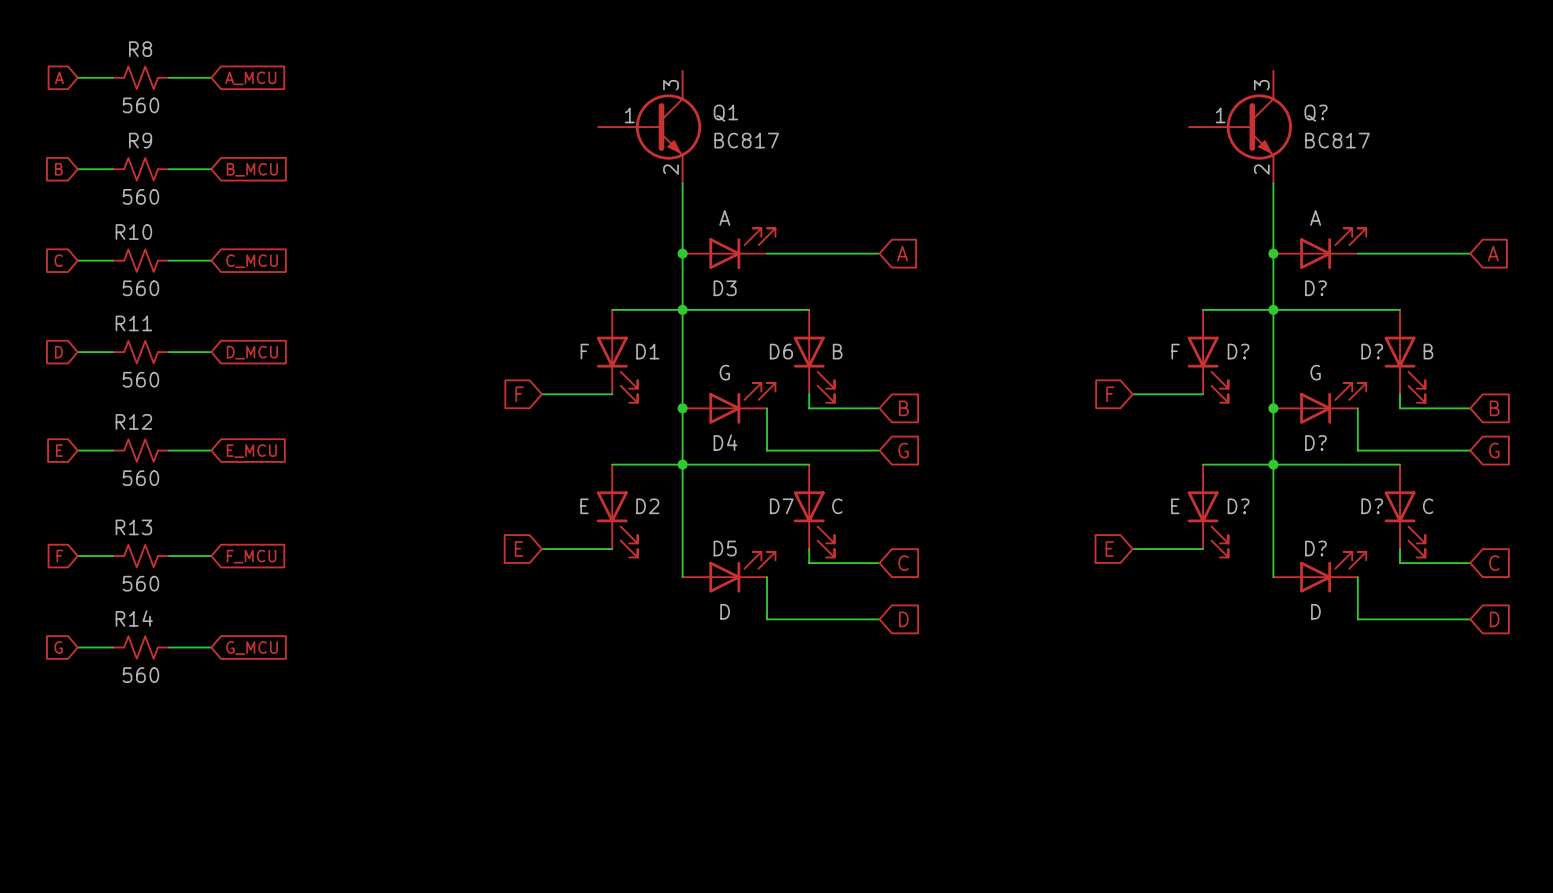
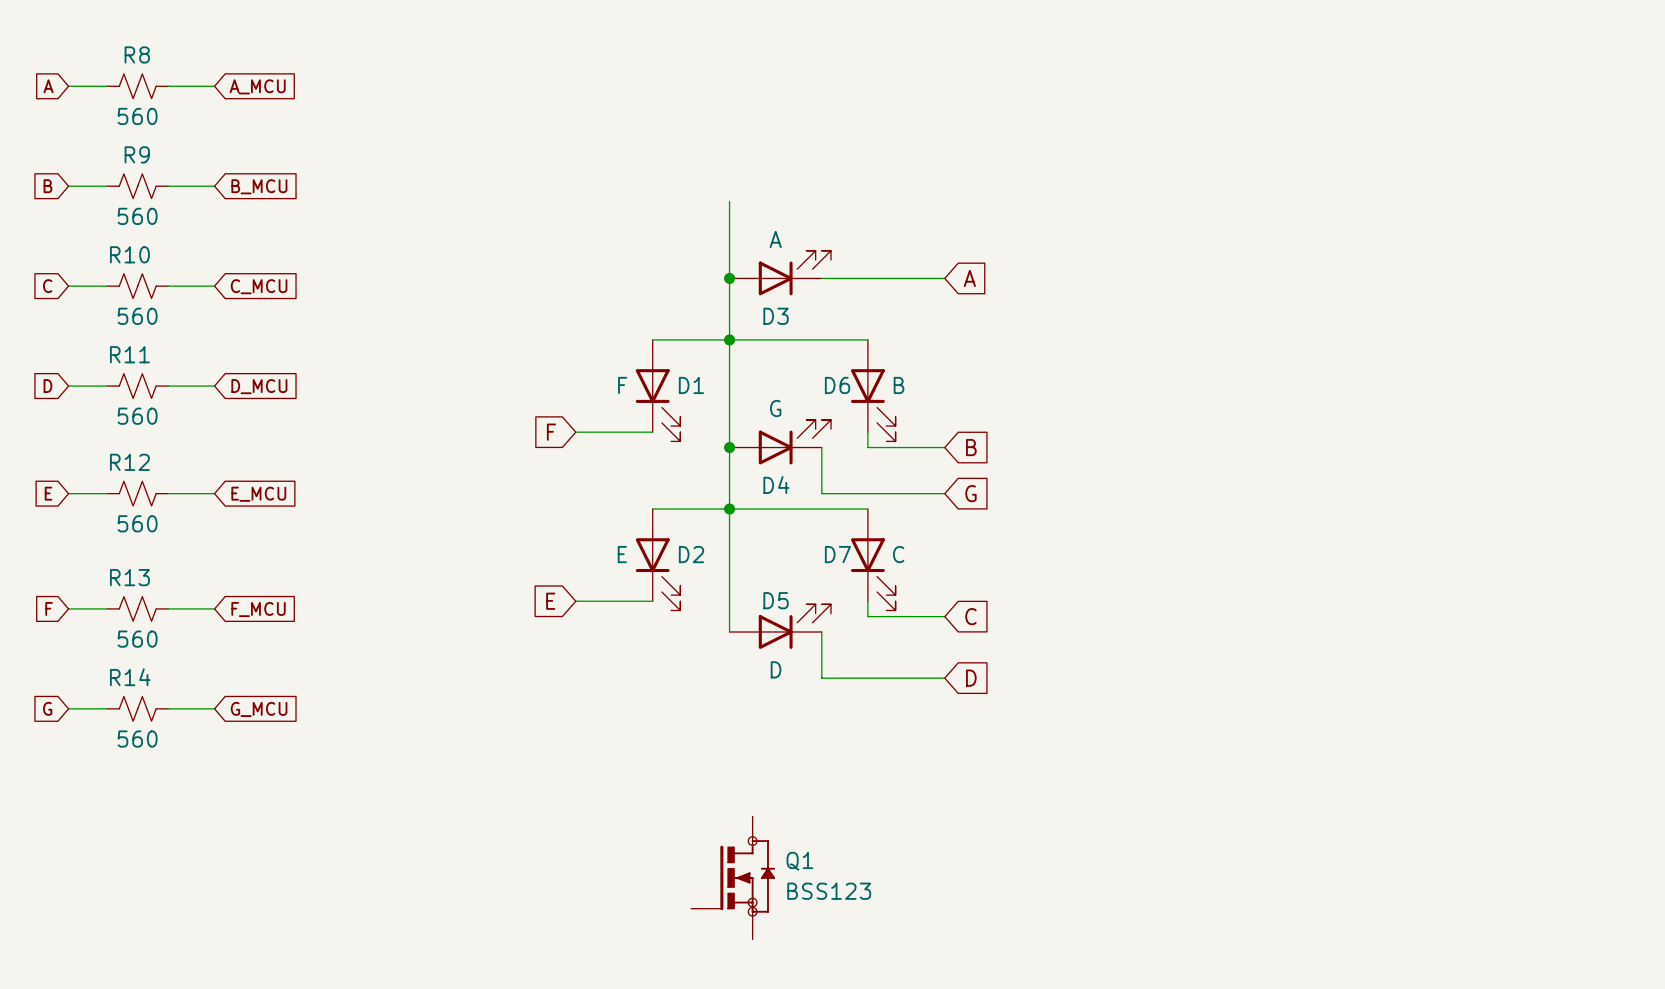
Q1 symbol: [598, 70, 702, 184] -> [691, 816, 776, 940]
Q?: BC817 (1240, 127) -> none
Q1 value: BC817 (746, 140) -> BSS123 (829, 891)
wire: (1273, 183) (1273, 577) -> none
D?: A (1319, 248) -> none
junction: (1273, 253) -> none
wire: (1357, 253) (1470, 253) -> none
global label: A (1493, 253) -> none
wire: (1203, 309) (1400, 309) -> none
junction: (1273, 309) -> none
D?: F (1207, 356) -> none
D?: B (1404, 356) -> none
global label: F (1110, 394) -> none
wire: (1132, 394) (1203, 394) -> none
wire: (1400, 394) (1400, 408) (1470, 408) -> none
D?: G (1319, 403) -> none
junction: (1273, 408) -> none
wire: (1357, 408) (1357, 450) (1470, 450) -> none
global label: B (1494, 408) -> none
global label: G (1494, 450) -> none
wire: (1203, 464) (1400, 464) -> none
junction: (1273, 464) -> none
D?: E (1207, 511) -> none
D?: C (1404, 511) -> none
global label: E (1109, 549) -> none
wire: (1132, 549) (1203, 549) -> none
wire: (1400, 549) (1400, 563) (1470, 563) -> none
global label: C (1494, 563) -> none
D?: D (1319, 572) -> none
wire: (1357, 577) (1357, 619) (1470, 619) -> none
global label: D (1494, 619) -> none

